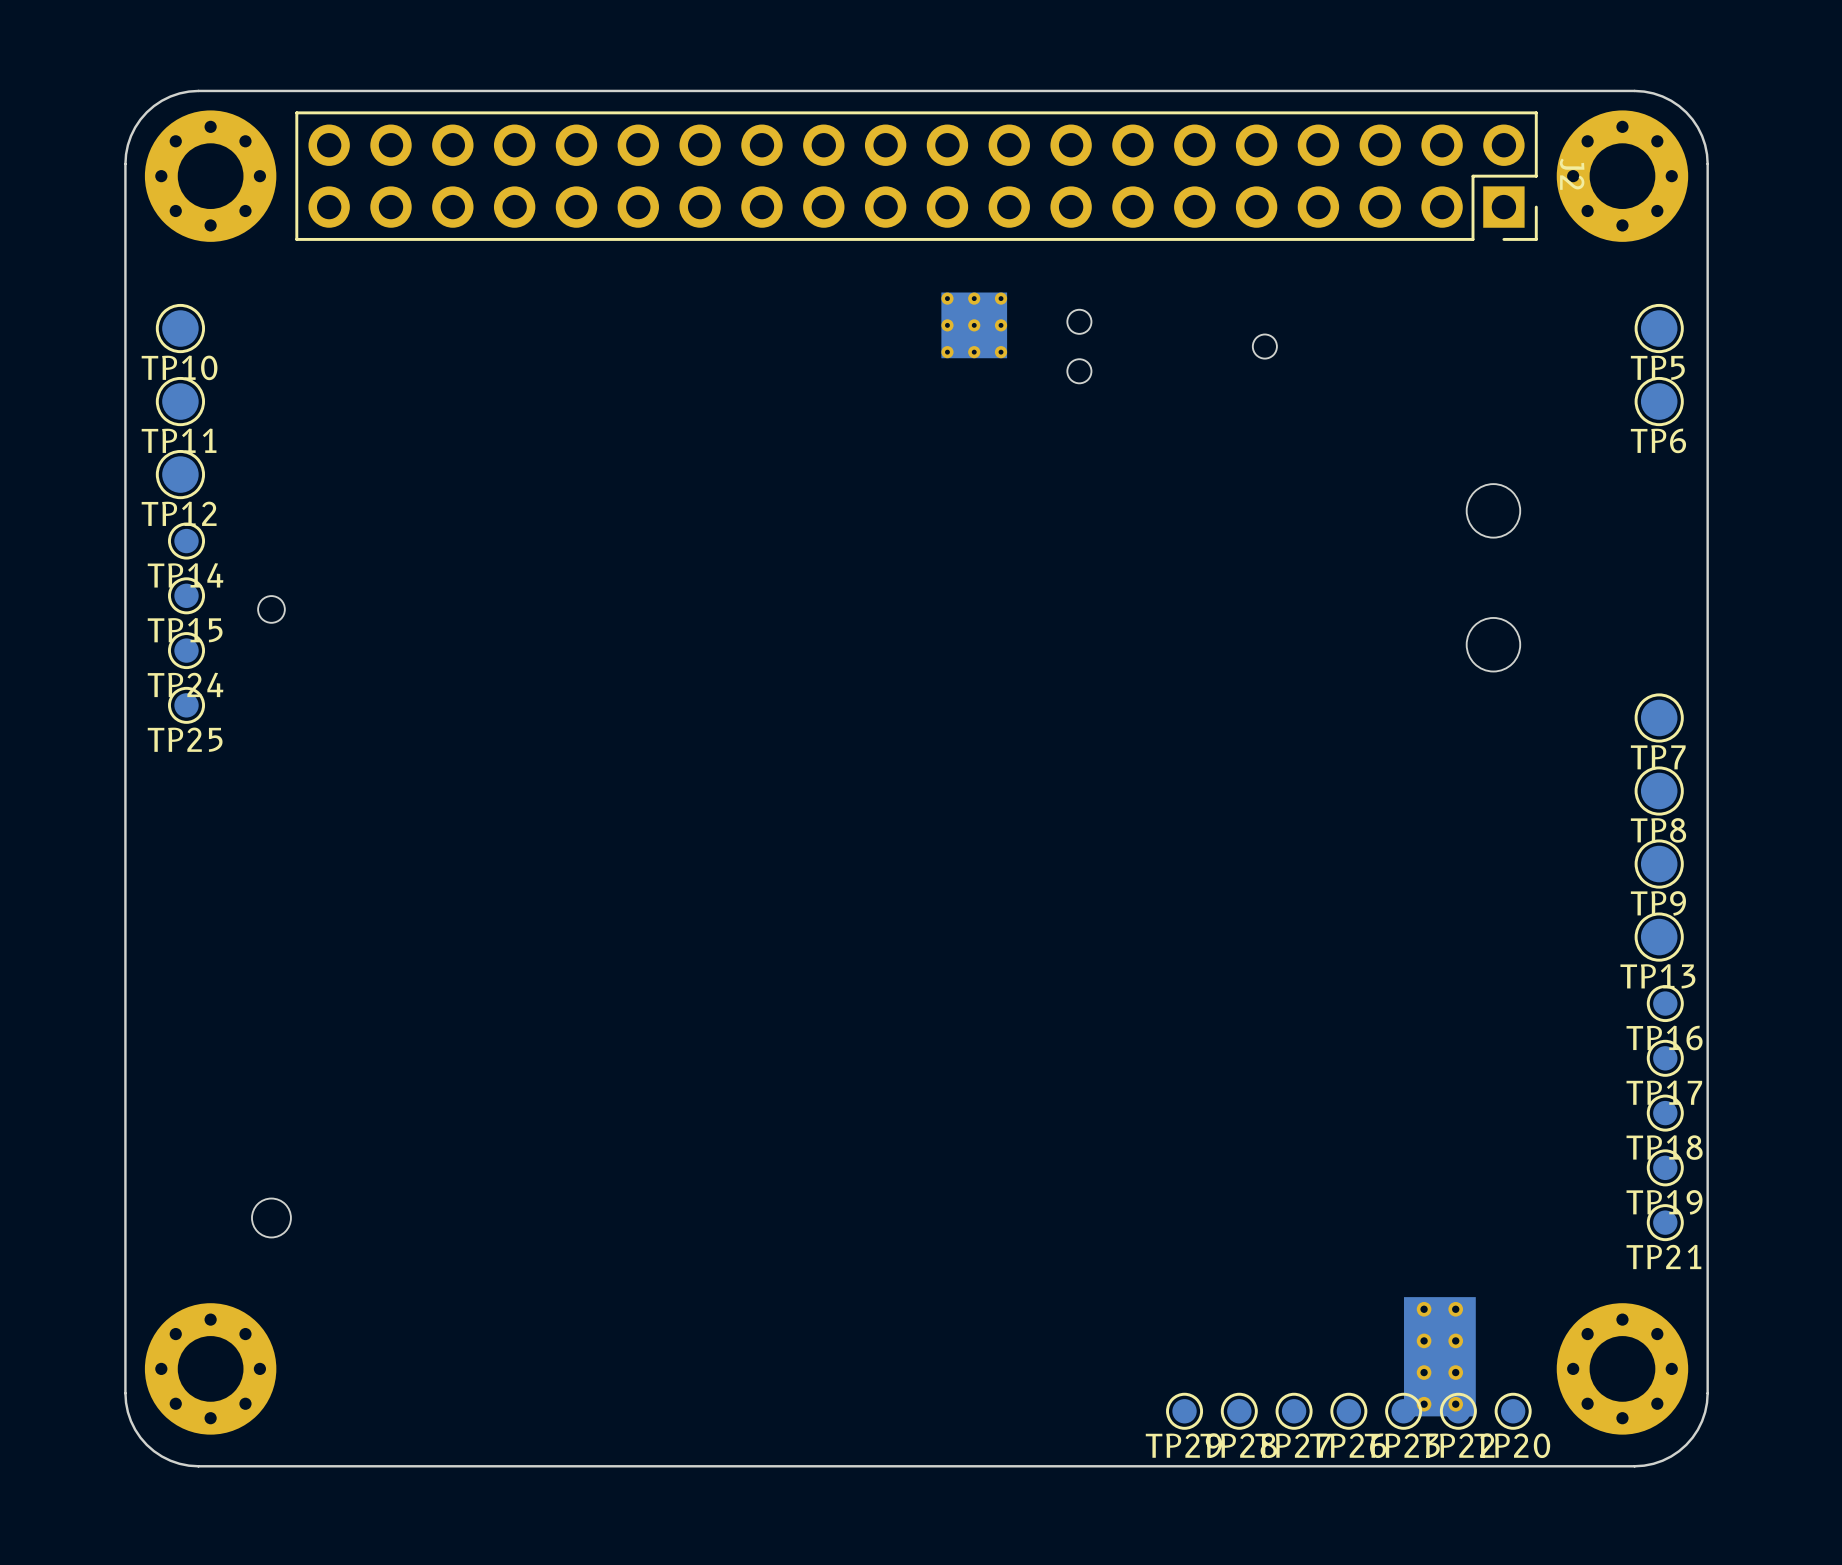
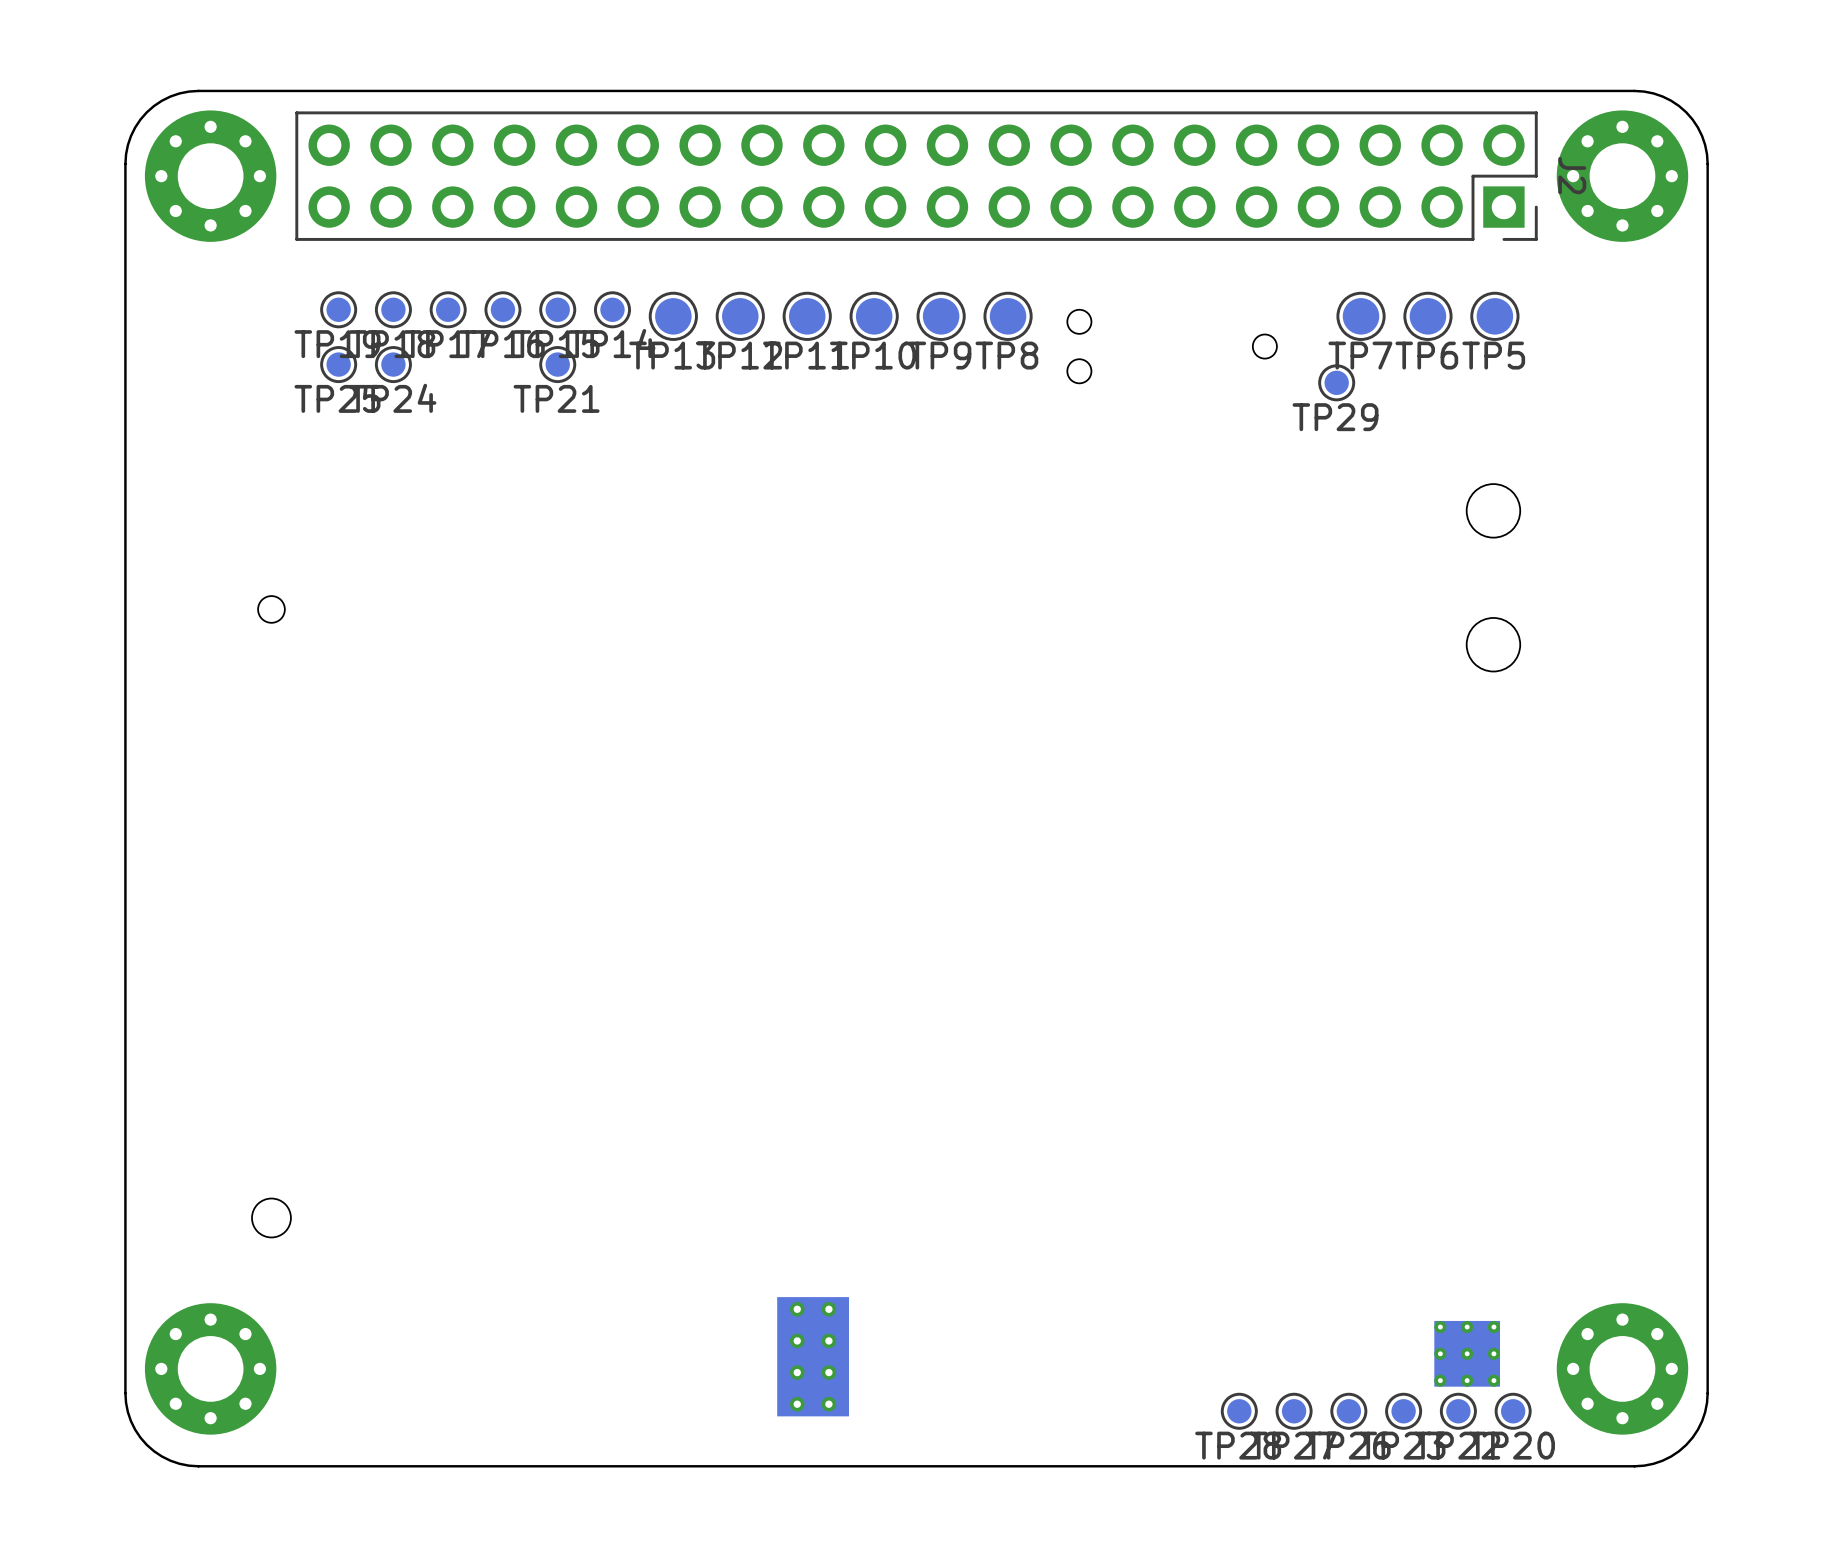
part: (974, 325) -> none
TP10 position: (180, 328) -> (874, 316)
TP5 position: (1659, 328) -> (1494, 316)
TP11 position: (180, 401) -> (807, 316)
TP6 position: (1659, 401) -> (1427, 316)
TP12 position: (180, 474) -> (740, 316)
TP14 position: (186, 541) -> (612, 309)
TP15 position: (186, 595) -> (557, 309)
TP24 position: (186, 650) -> (393, 364)
TP25 position: (186, 705) -> (338, 364)
TP7 position: (1659, 717) -> (1361, 316)
TP8 position: (1659, 791) -> (1008, 316)
TP9 position: (1659, 864) -> (941, 316)
TP13 position: (1659, 937) -> (673, 316)
TP16 position: (1665, 1003) -> (502, 309)
TP17 position: (1665, 1058) -> (448, 309)
TP18 position: (1665, 1113) -> (393, 309)
TP19 position: (1665, 1167) -> (338, 309)
TP21 position: (1665, 1222) -> (557, 364)
part: none -> (1467, 1353)
part: none -> (813, 1356)
part: (1439, 1356) -> none
TP29 position: (1184, 1411) -> (1336, 382)

